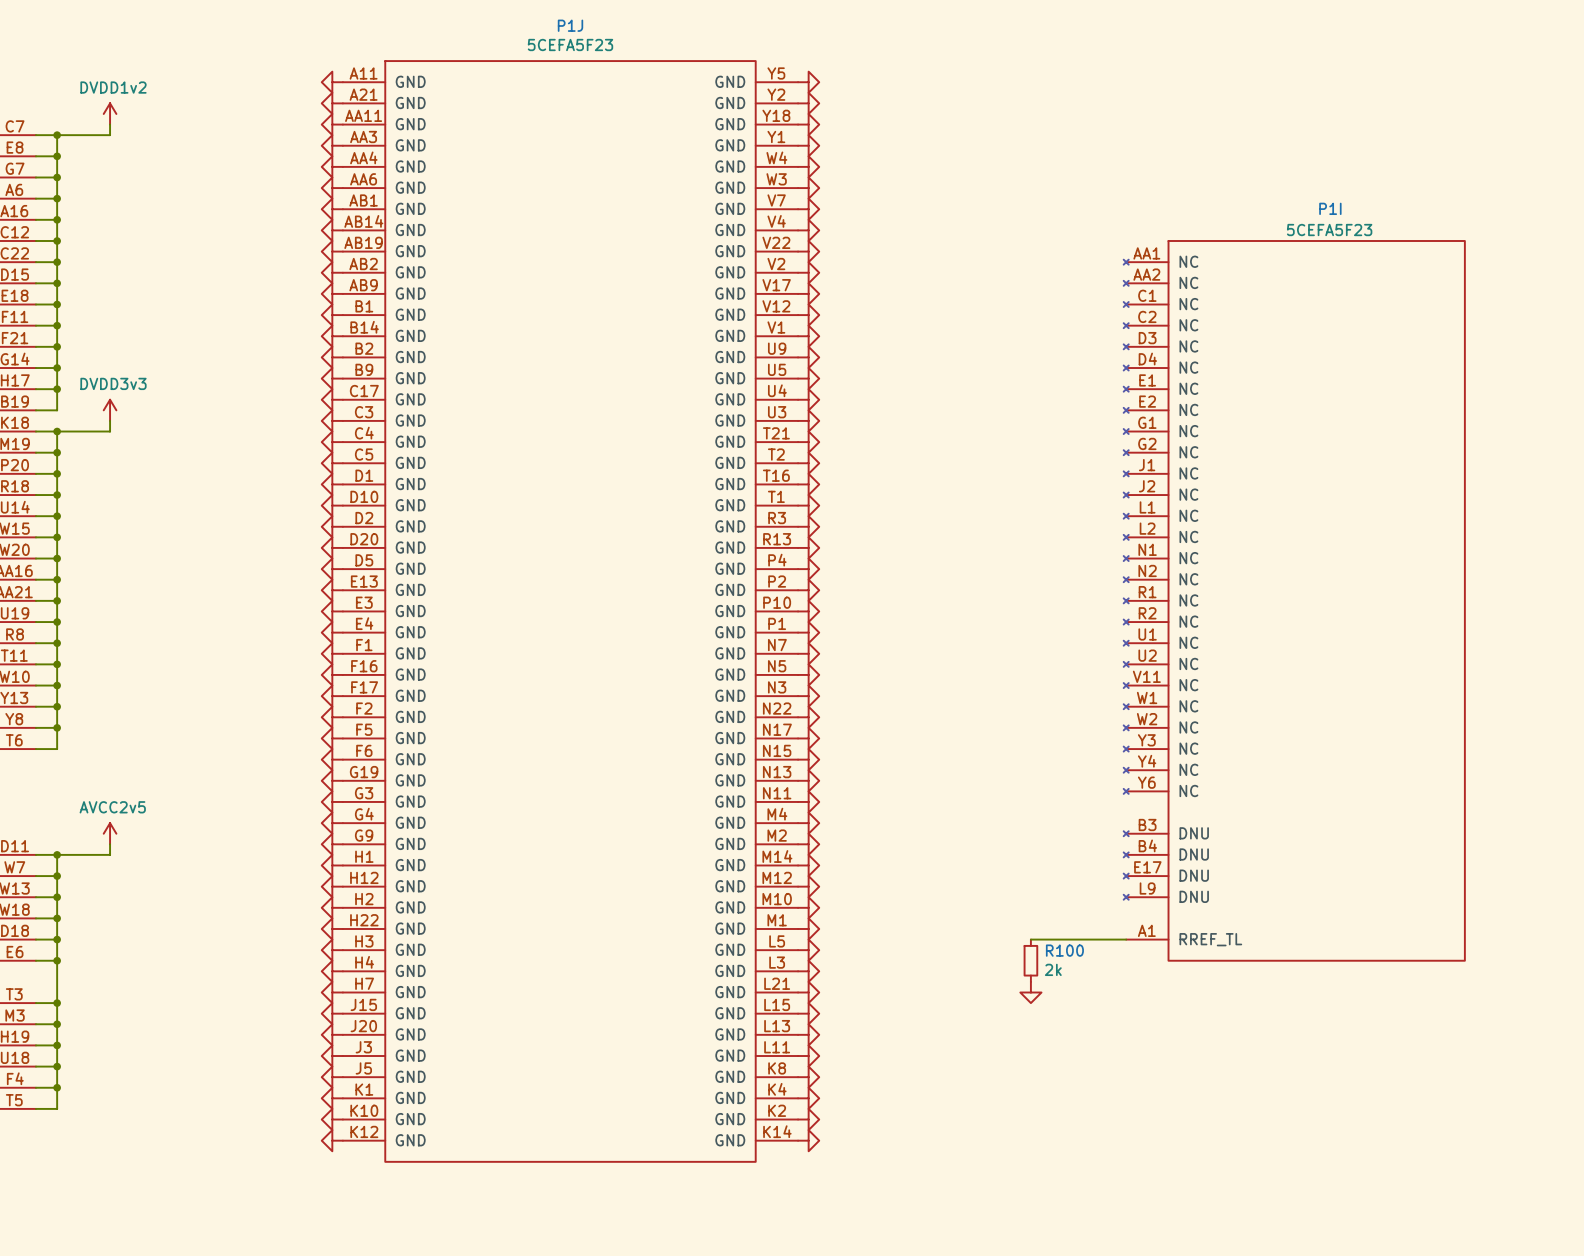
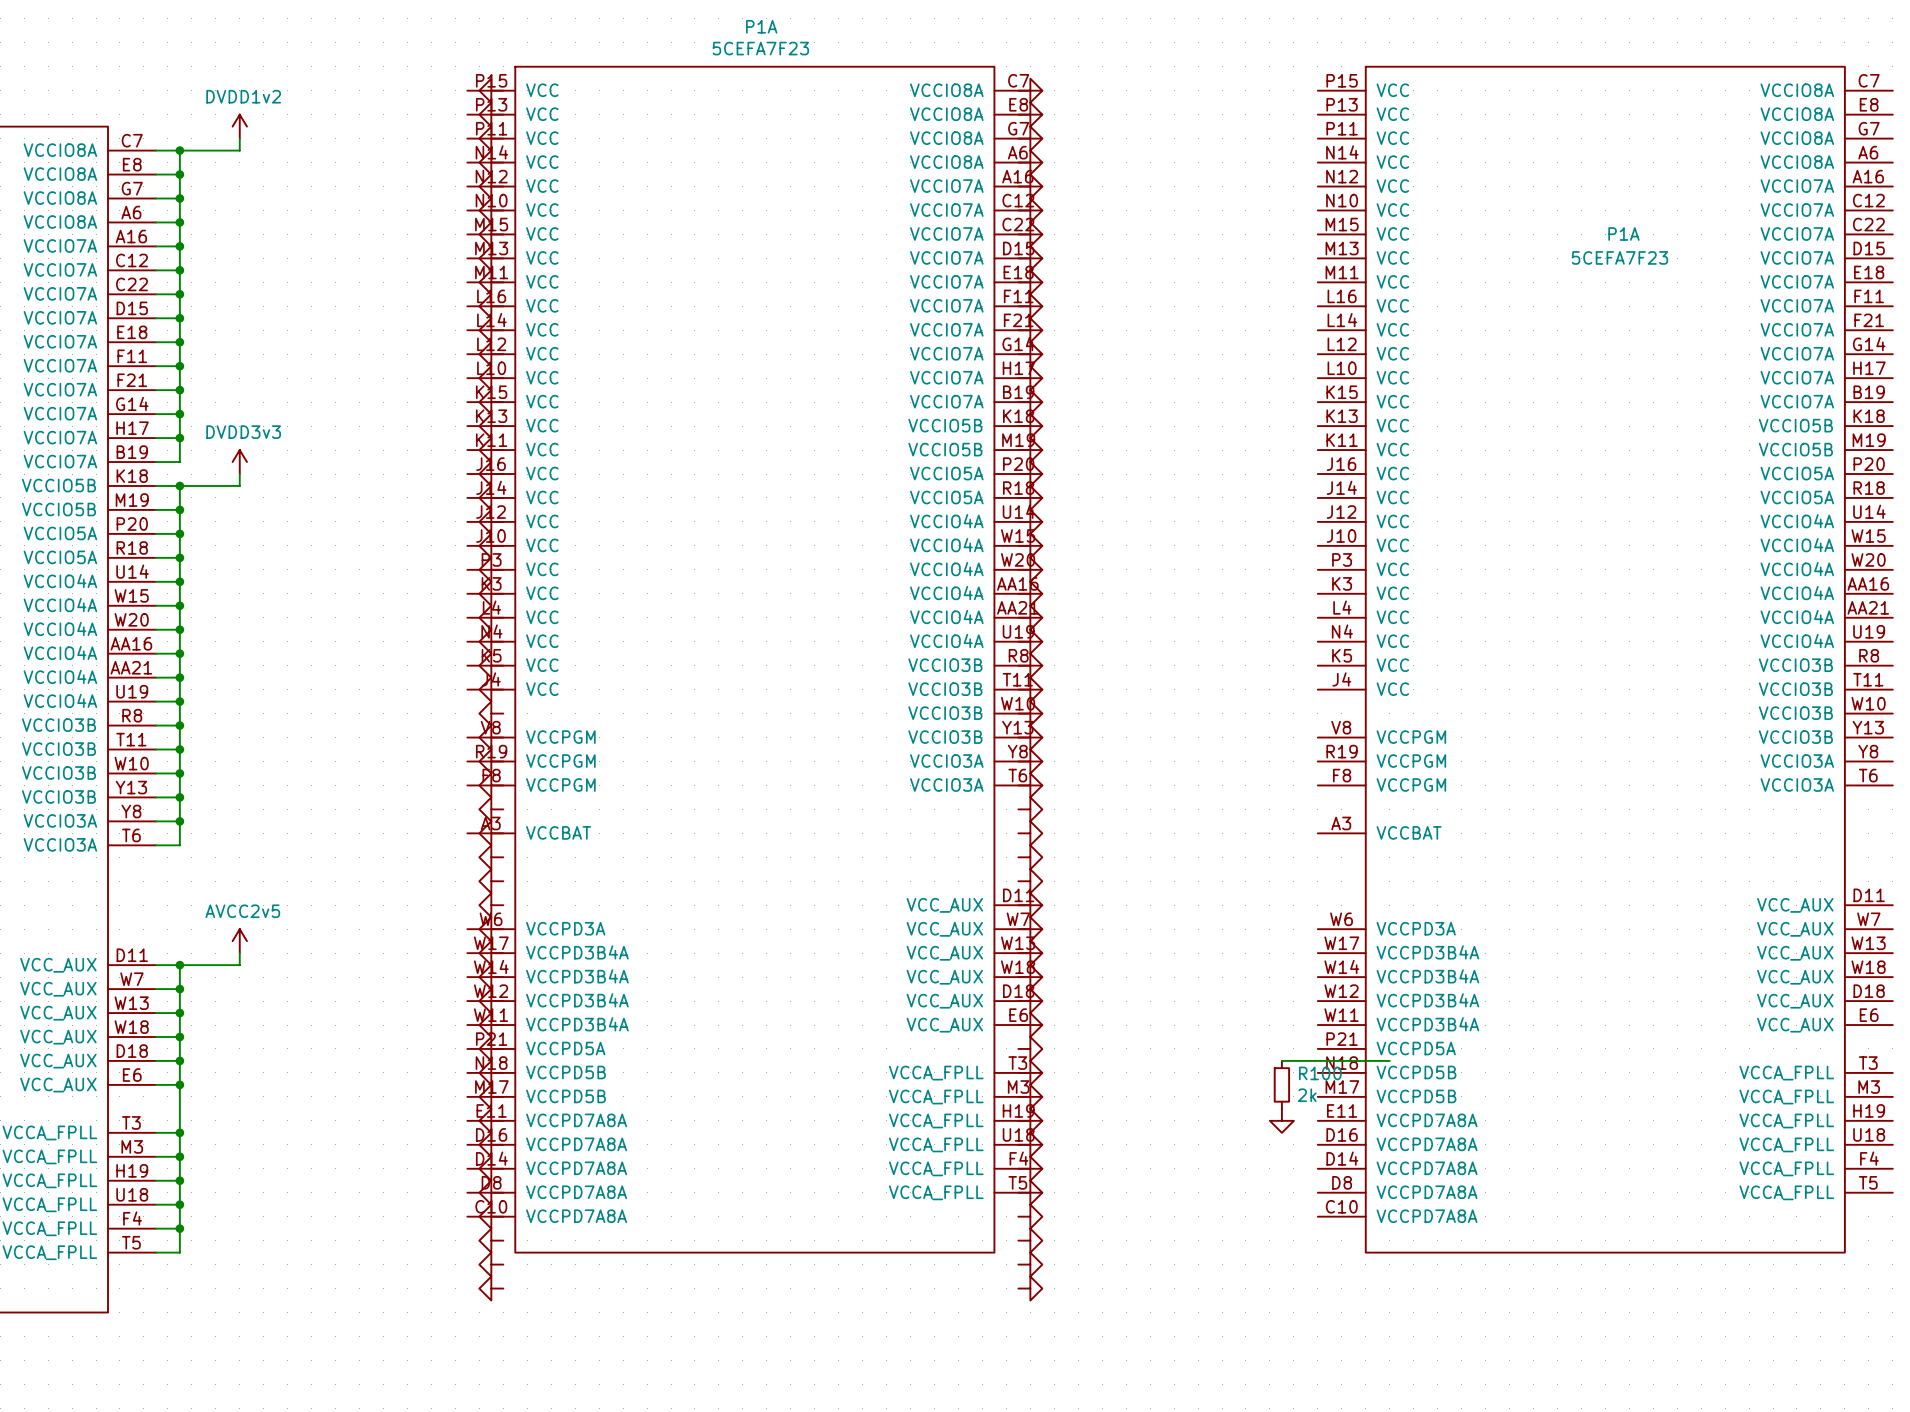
P1A: none -> 5CEFA7F23 (754, 659)
P1A: none -> 5CEFA7F23 (1605, 659)
P1I: 5CEFA5F23 (1294, 600) -> none
P1J: 5CEFA5F23 (570, 611) -> none

